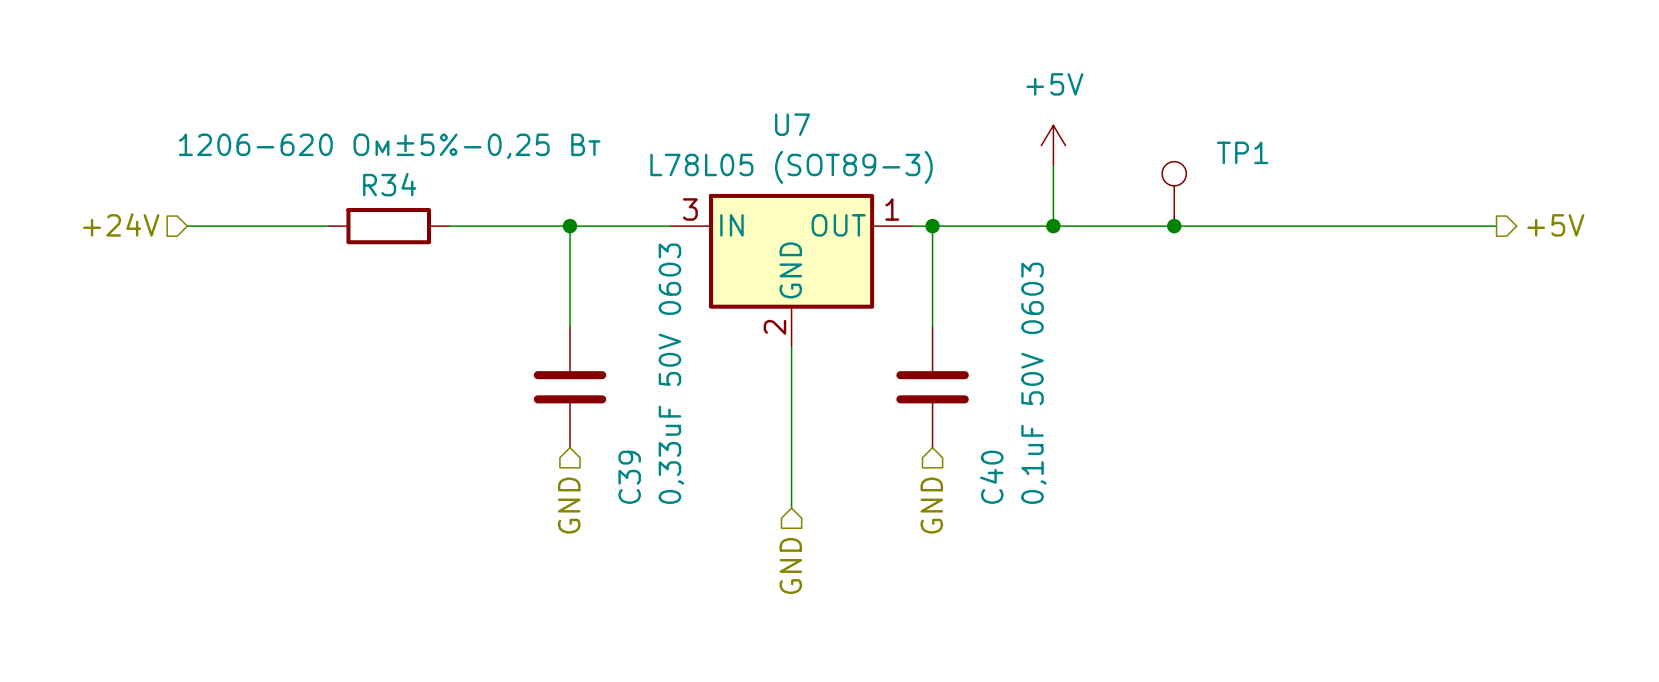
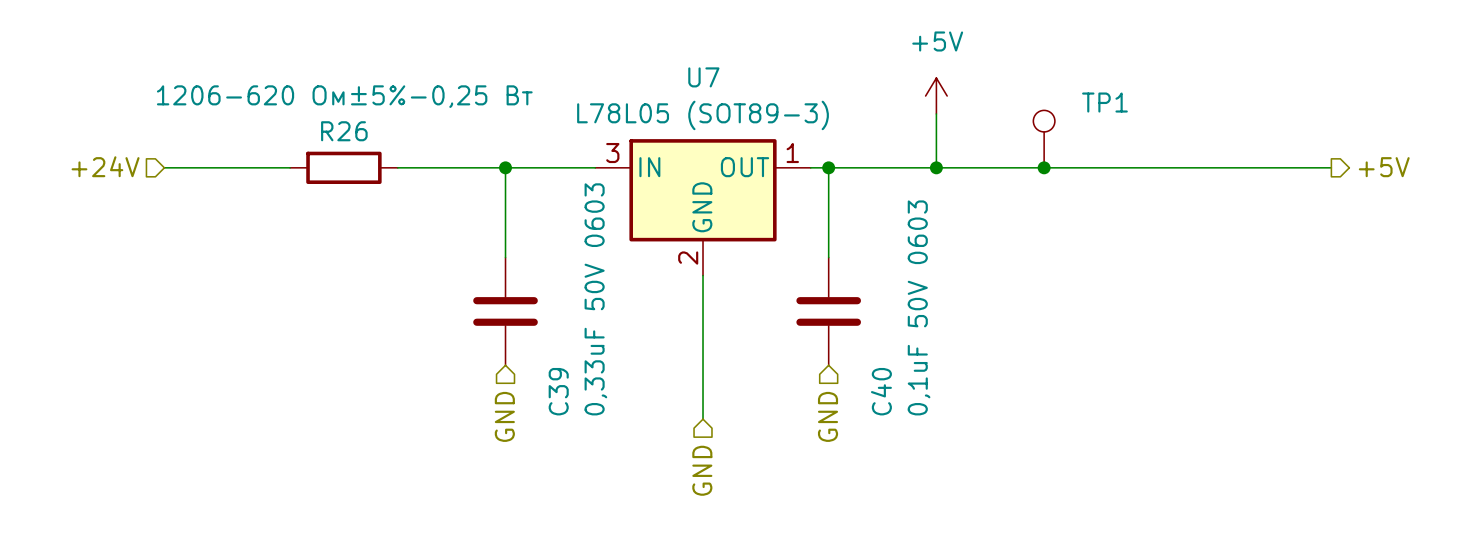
R34 name: R34 (389, 184) -> R26 (344, 131)

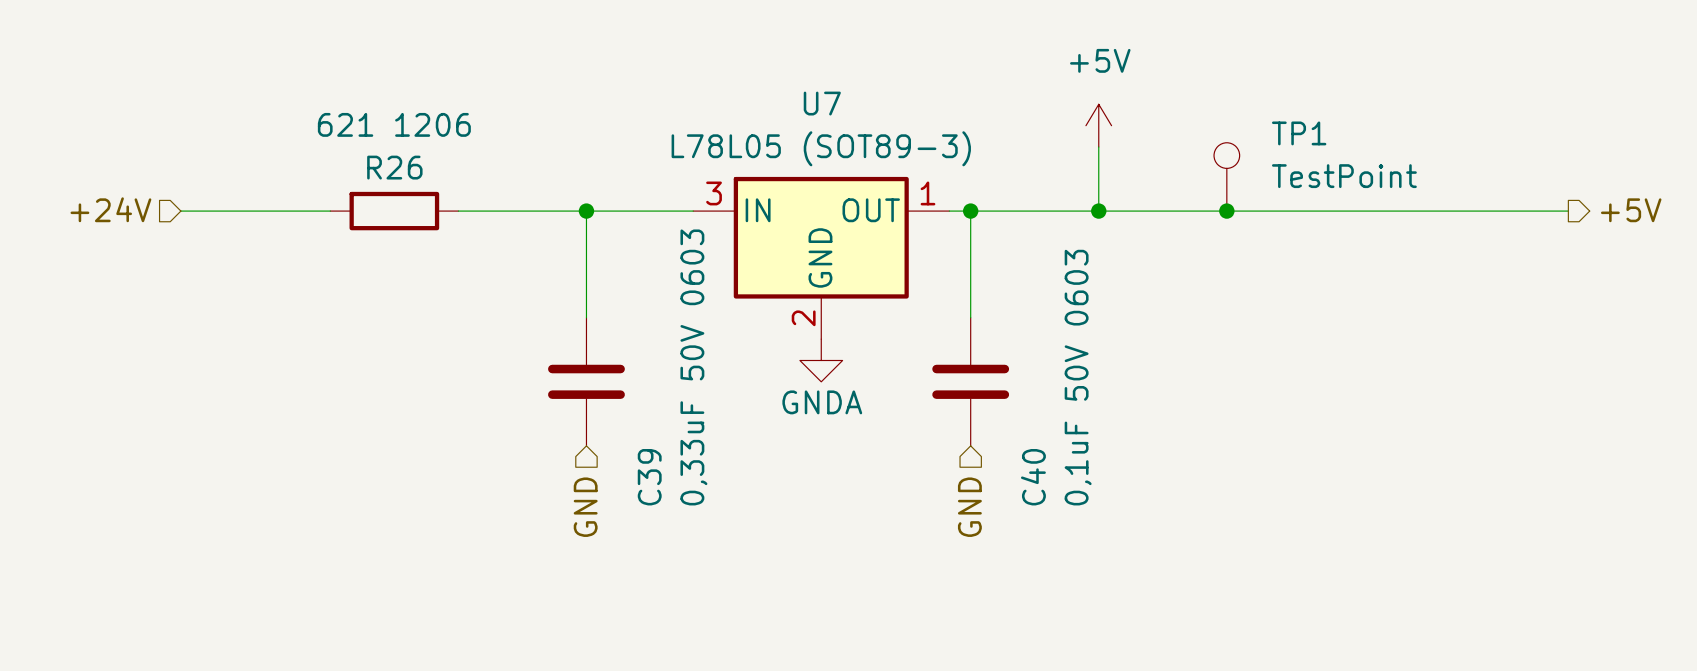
R26 value: 1206-620 Ом±5%-0,25 Вт (344, 96) -> 621 1206 (394, 124)
TP1 value: none -> TestPoint (1344, 176)
wire: (703, 275) (703, 419) -> none
power symbol: none -> GNDA (821, 360)
hierarchical label: GND (702, 470) -> none

